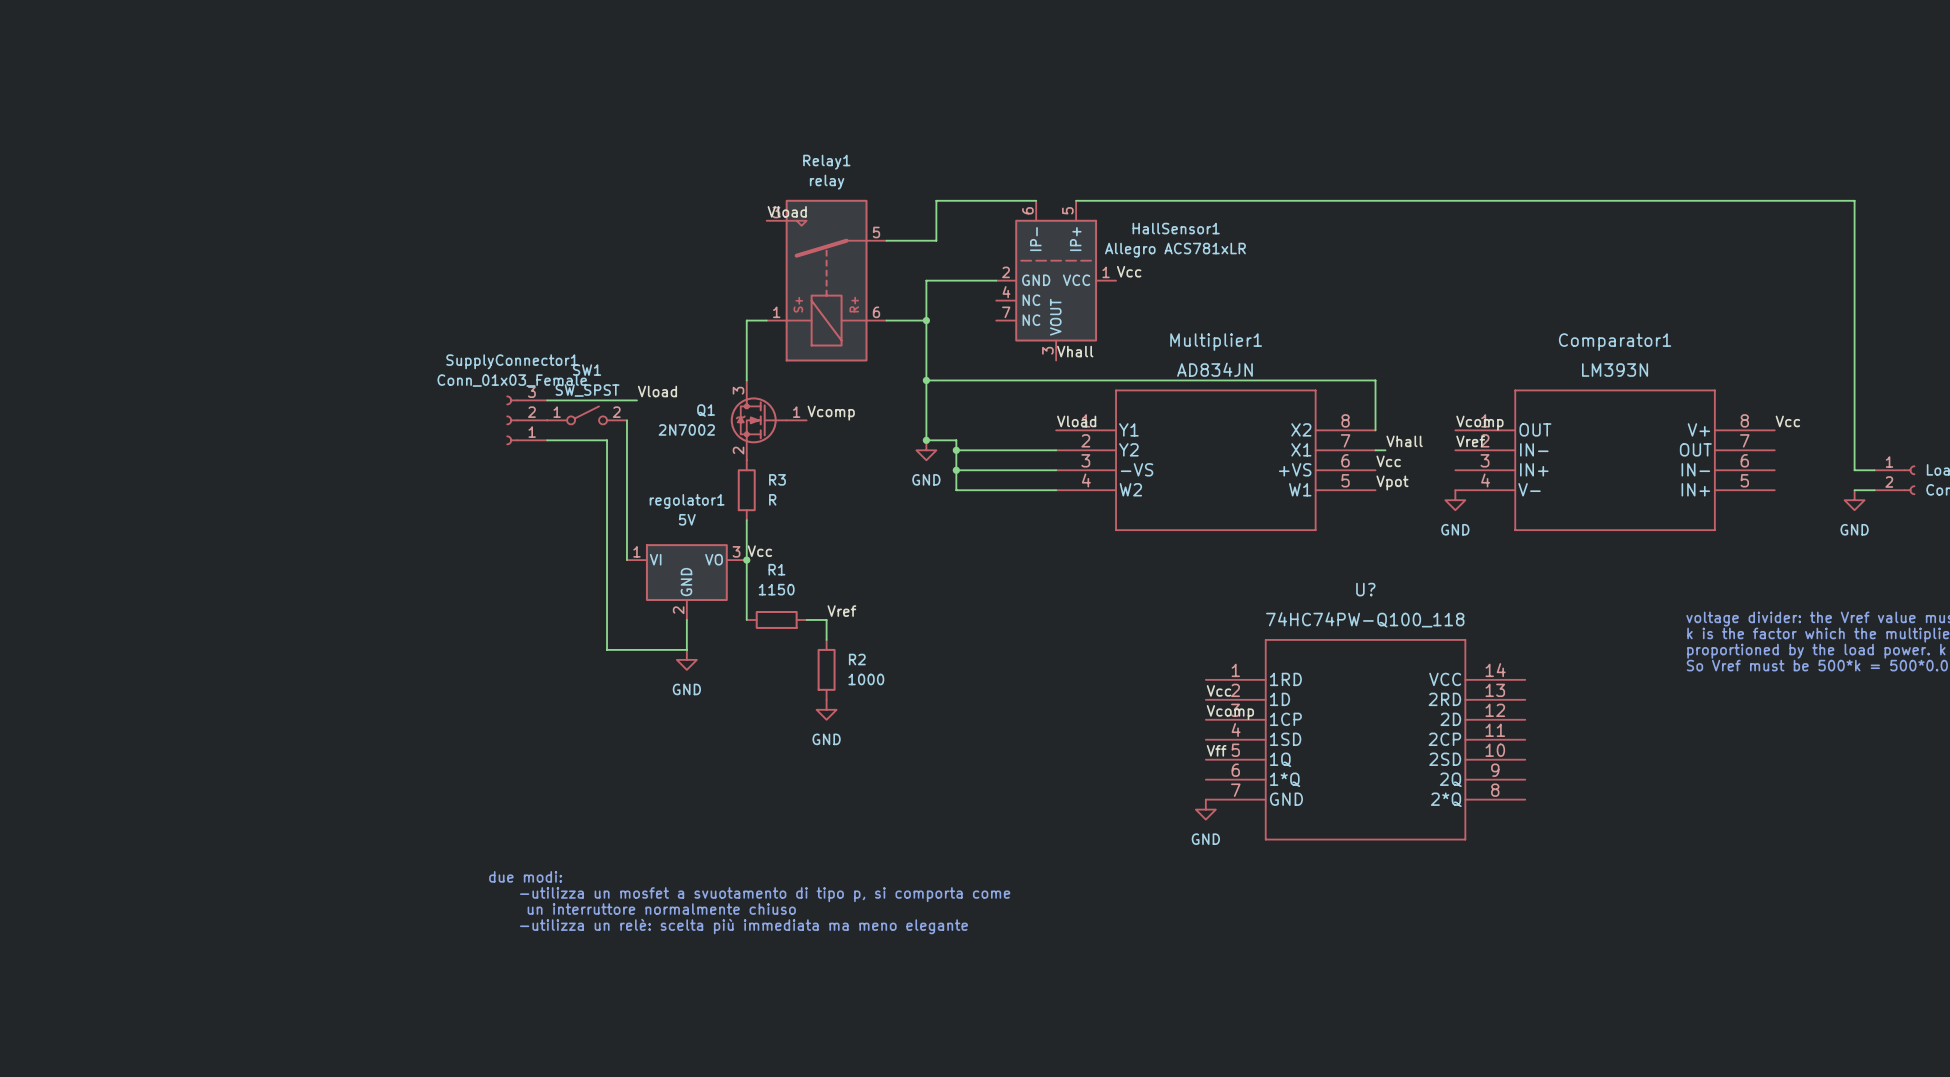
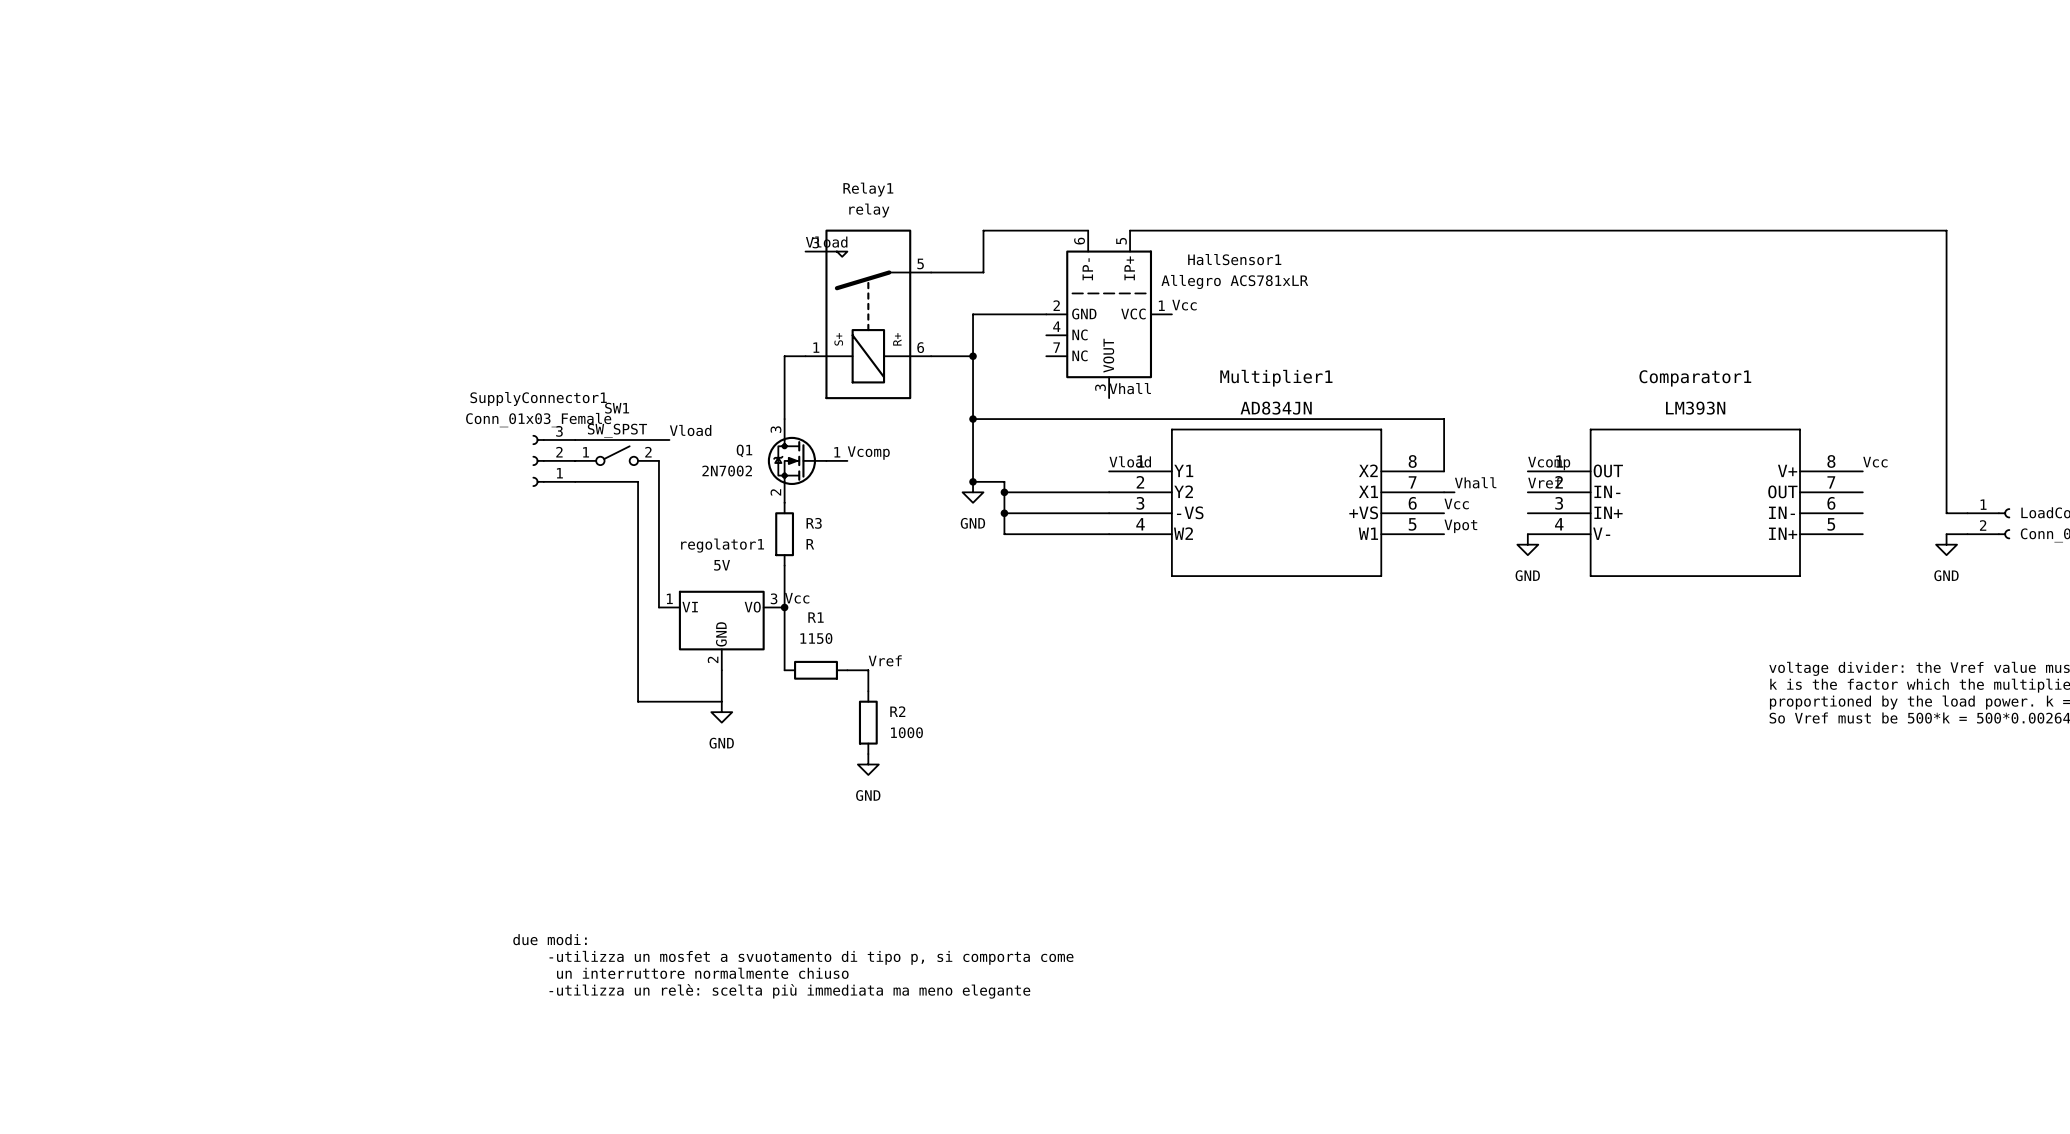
label: Vcc (1218, 690) -> none
label: Vcomp (1230, 712) -> none
U?: 74HC74PW-Q100_118 (1365, 739) -> none
label: Vff (1216, 750) -> none
power symbol: GND (1205, 809) -> none

